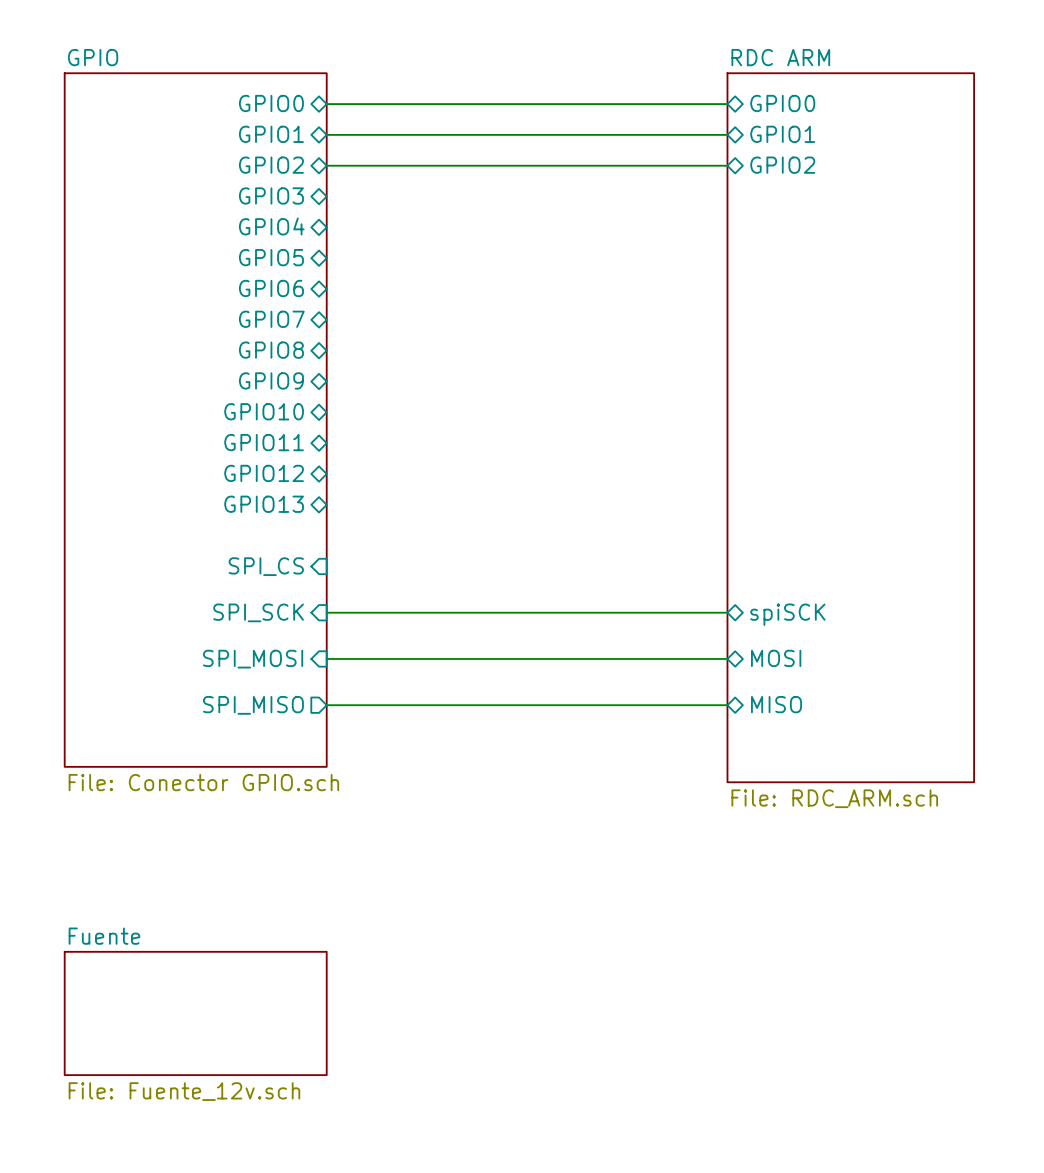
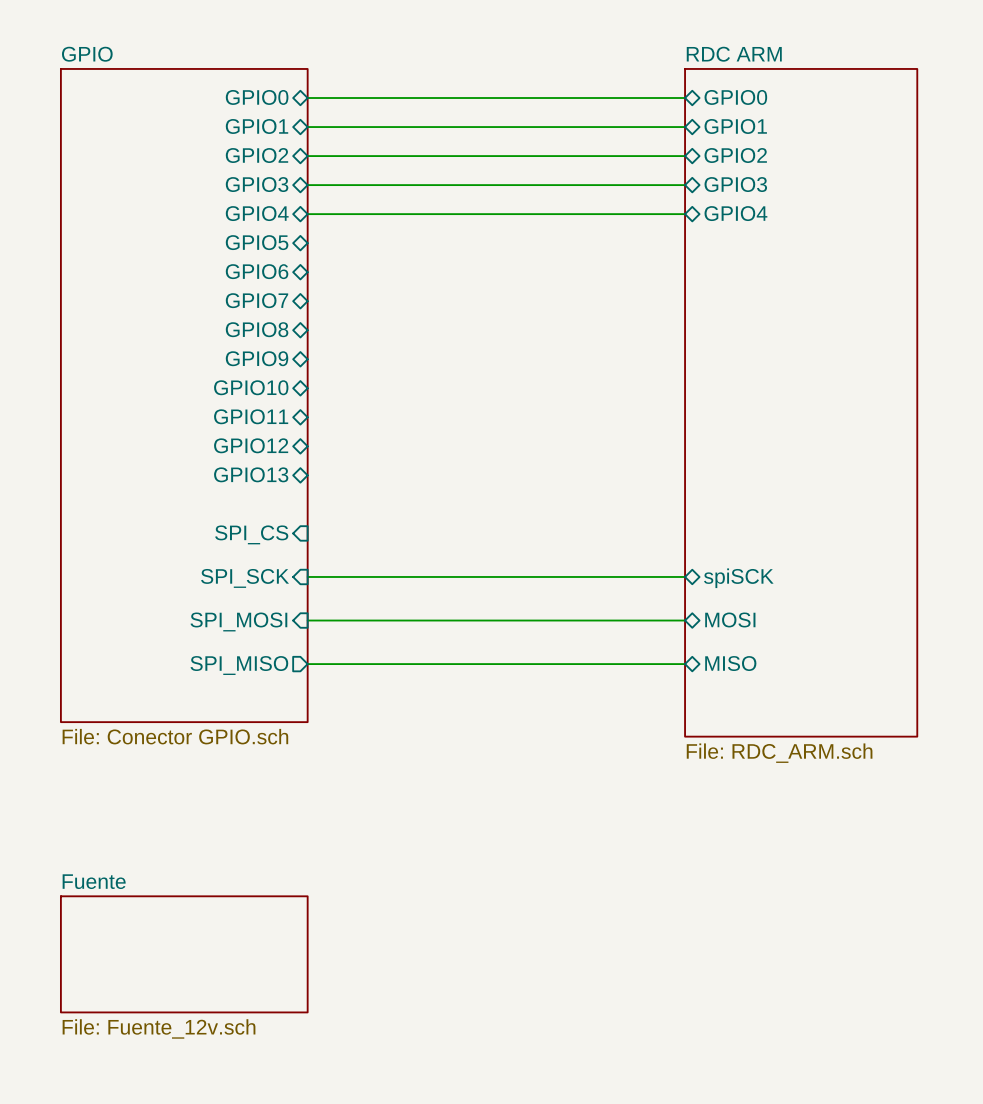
sheet pin: none -> GPIO3 (735, 184)
wire: none -> (307, 185) (685, 185)
sheet pin: none -> GPIO4 (735, 213)
wire: none -> (307, 214) (685, 214)

